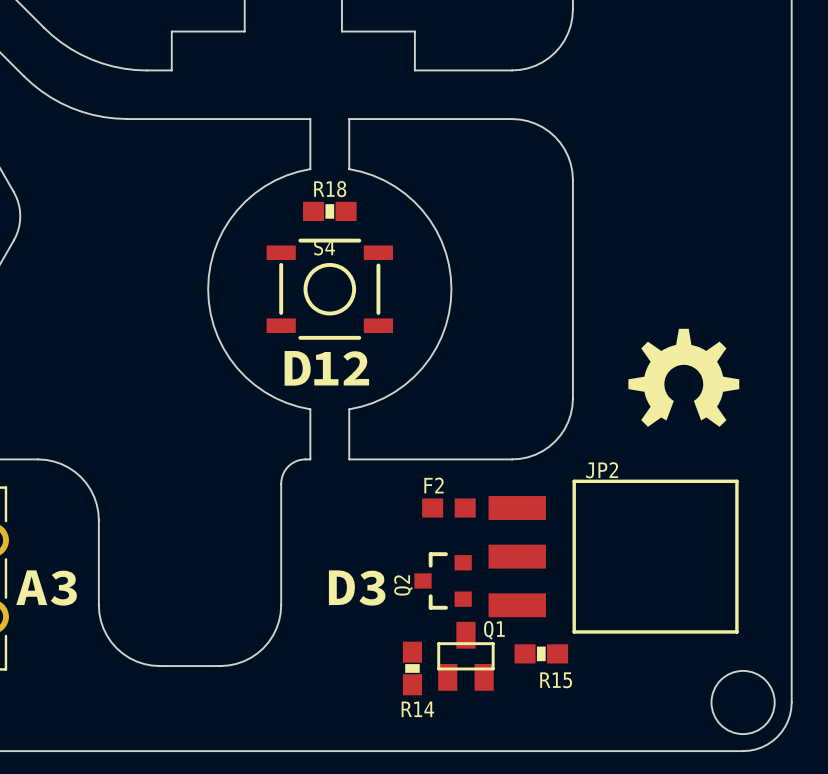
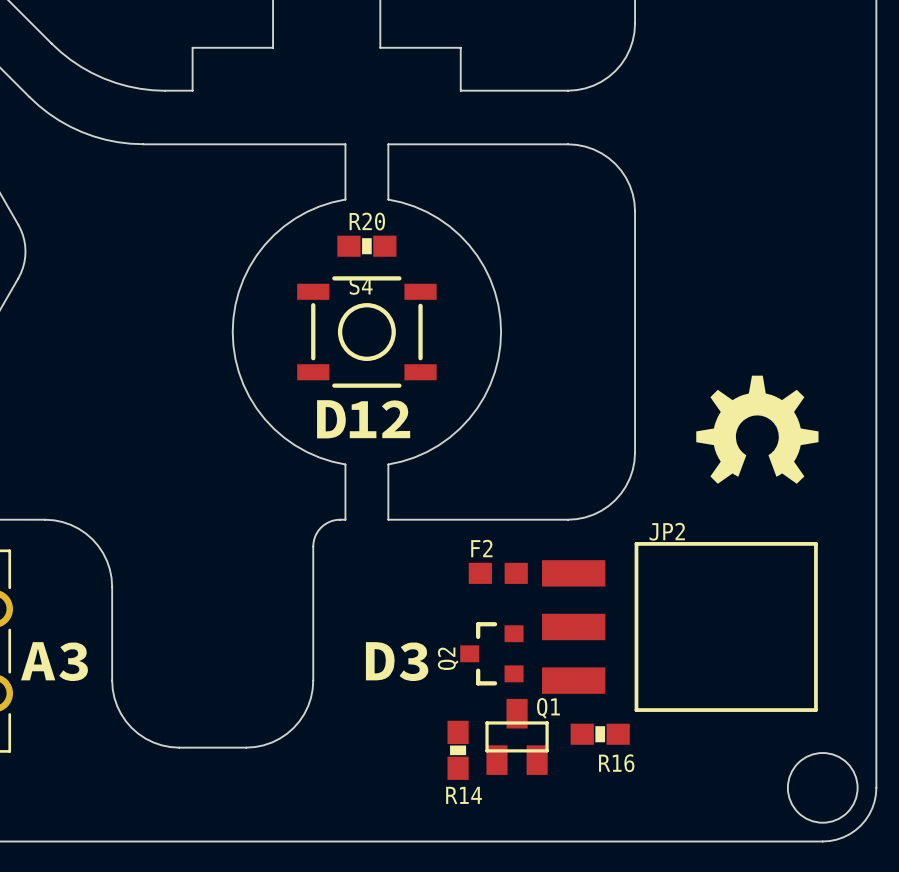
R18 name: R18 (330, 189) -> R20 (367, 221)
R15 name: R15 (556, 680) -> R16 (616, 763)

